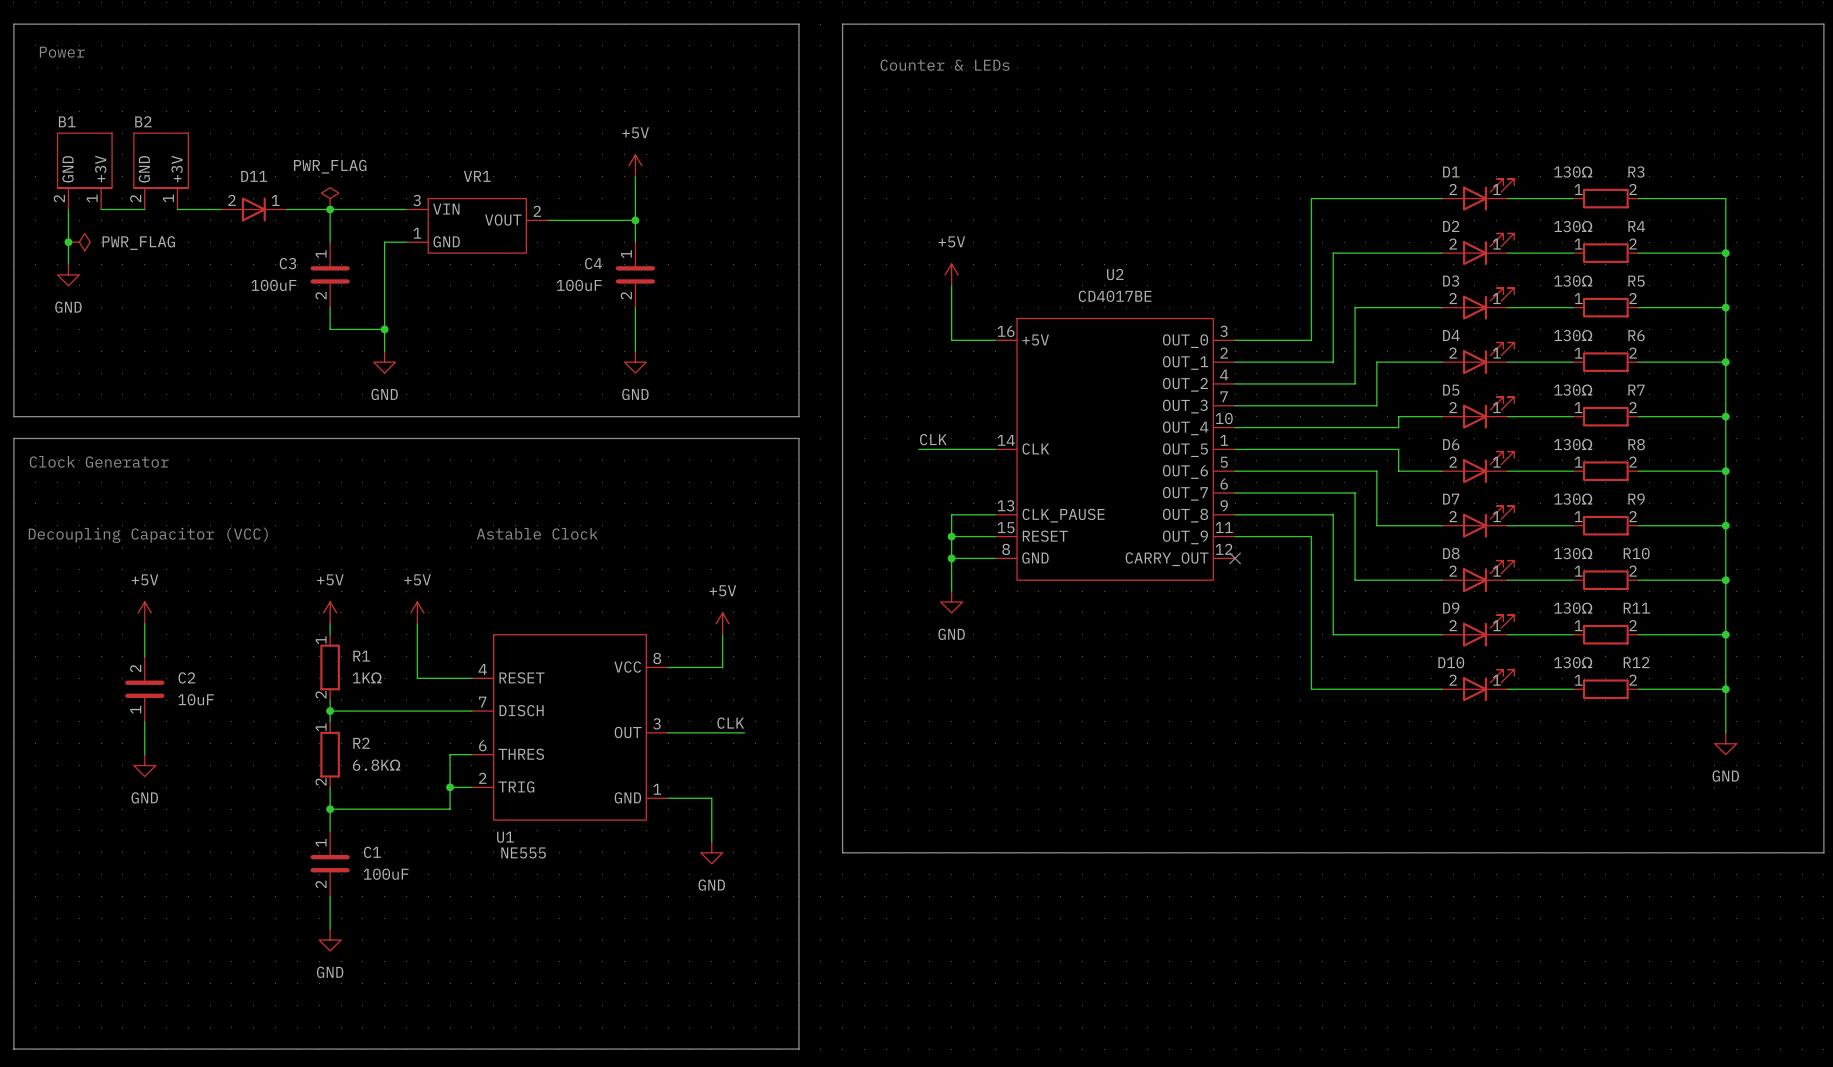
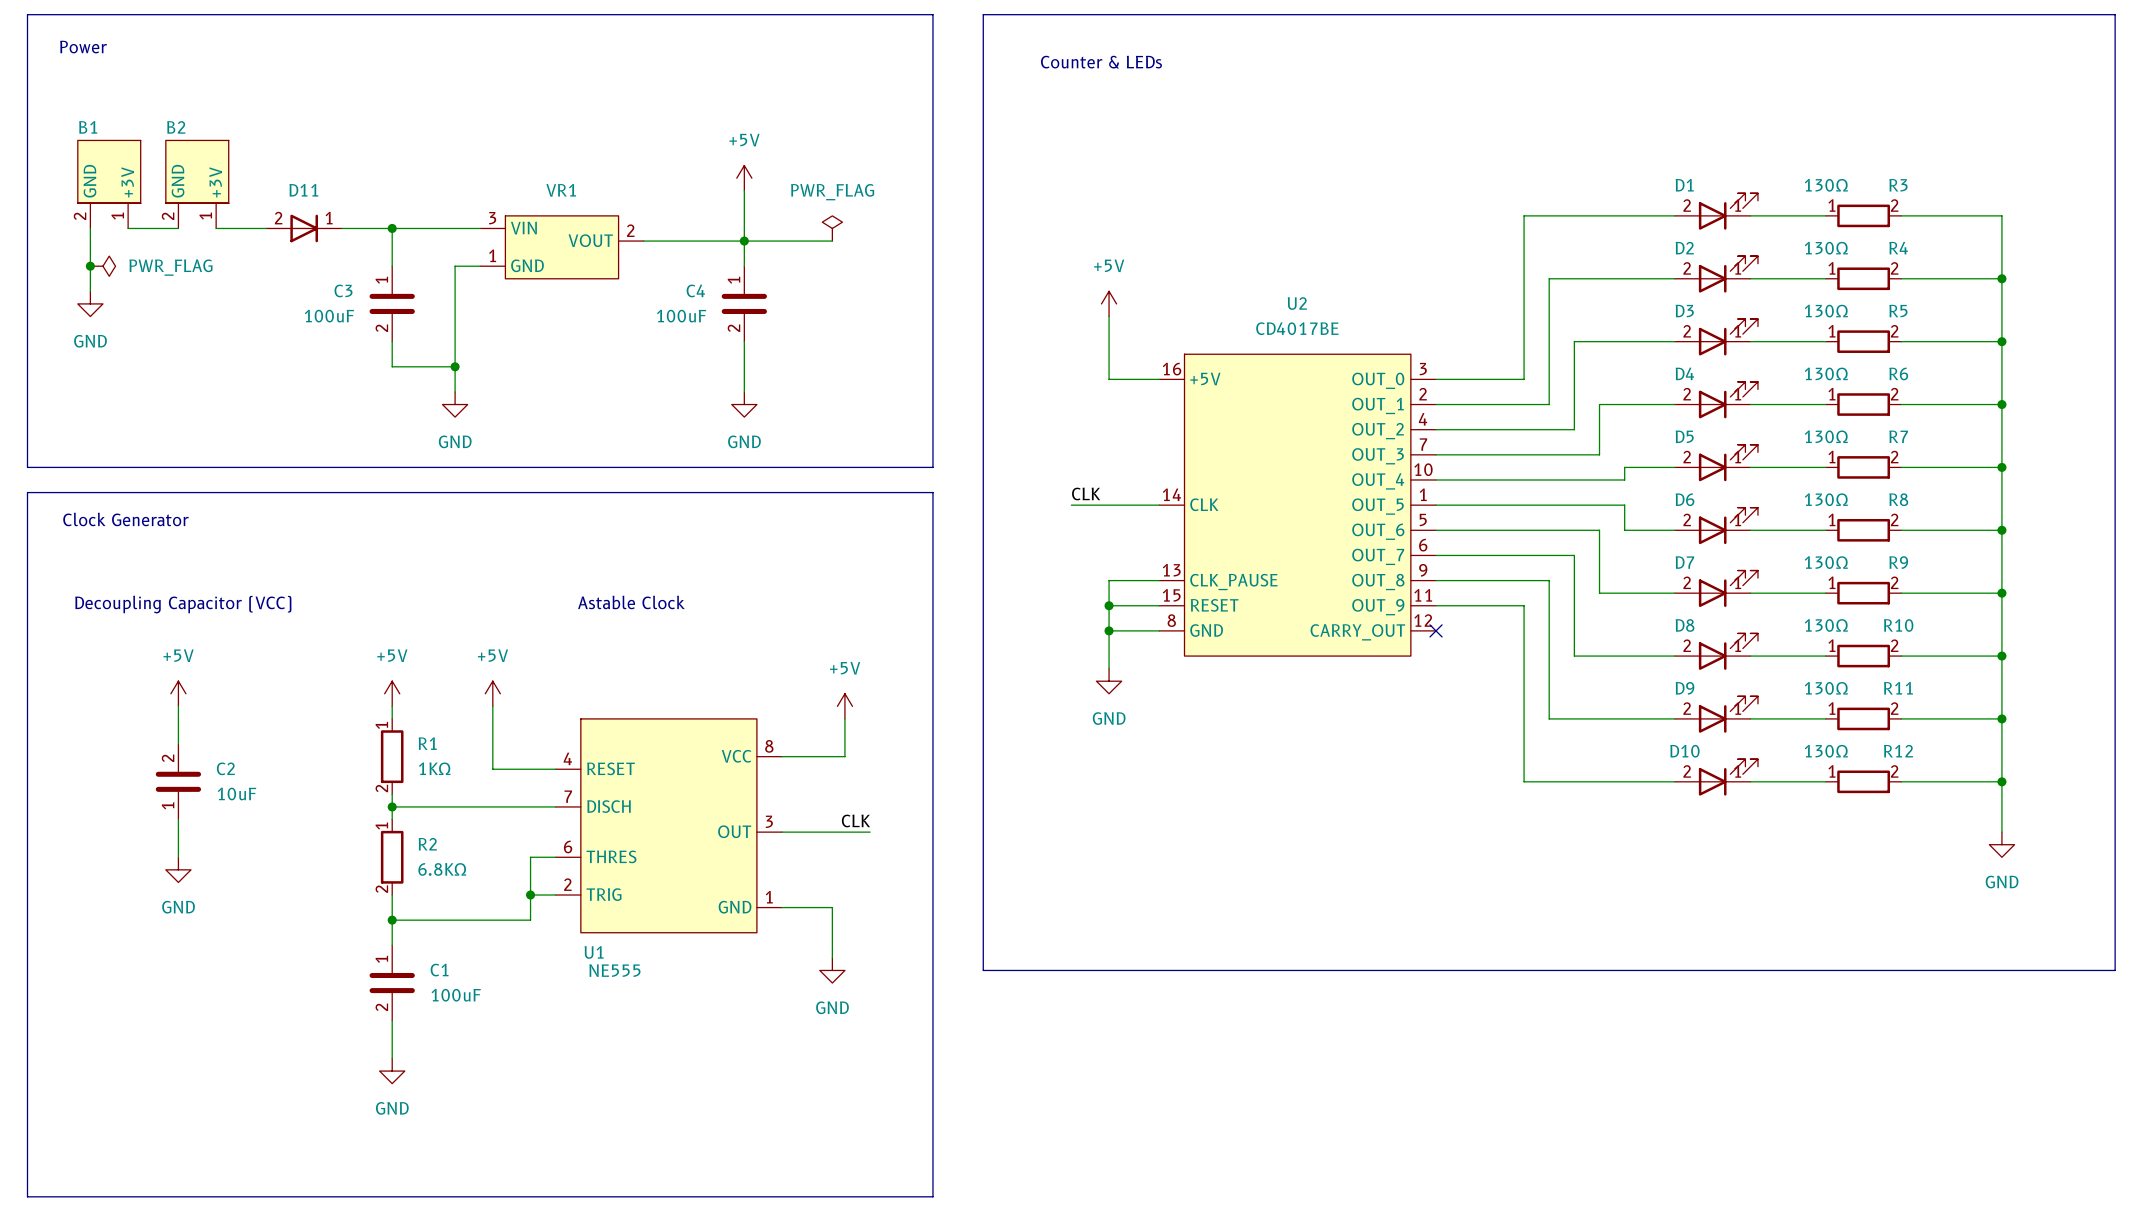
power symbol: PWR_FLAG (330, 198) -> none
power symbol: none -> PWR_FLAG (832, 228)
wire: none -> (744, 241) (832, 241)

